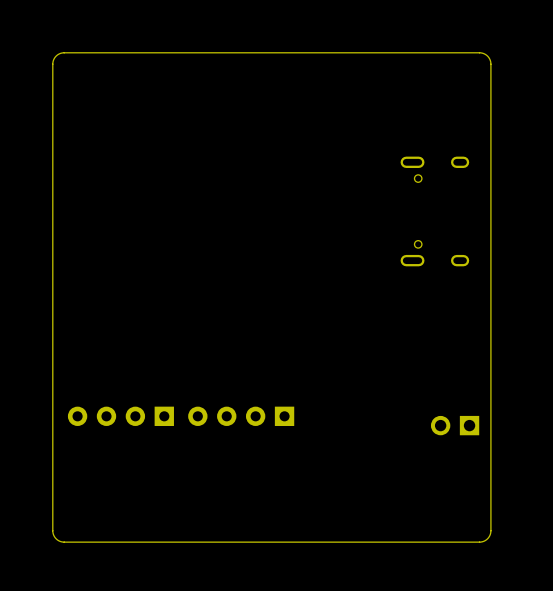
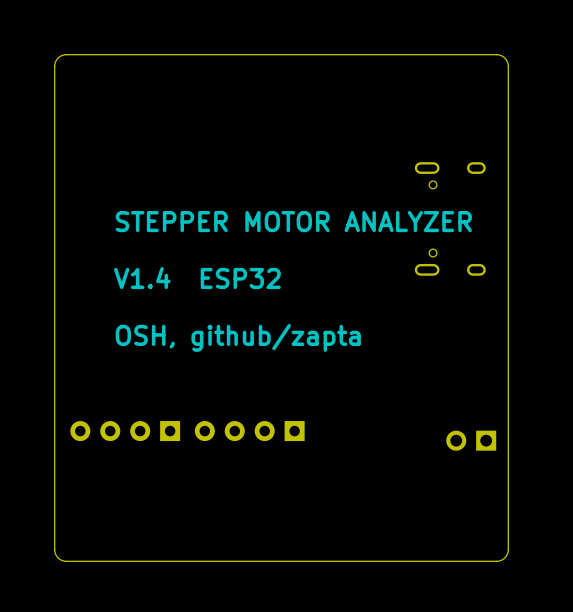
text: none -> STEPPER MOTOR ANALYZER (293, 221)
text: none -> V1.4 ESP32 (197, 278)
text: none -> OSH, github/zapta (238, 337)

